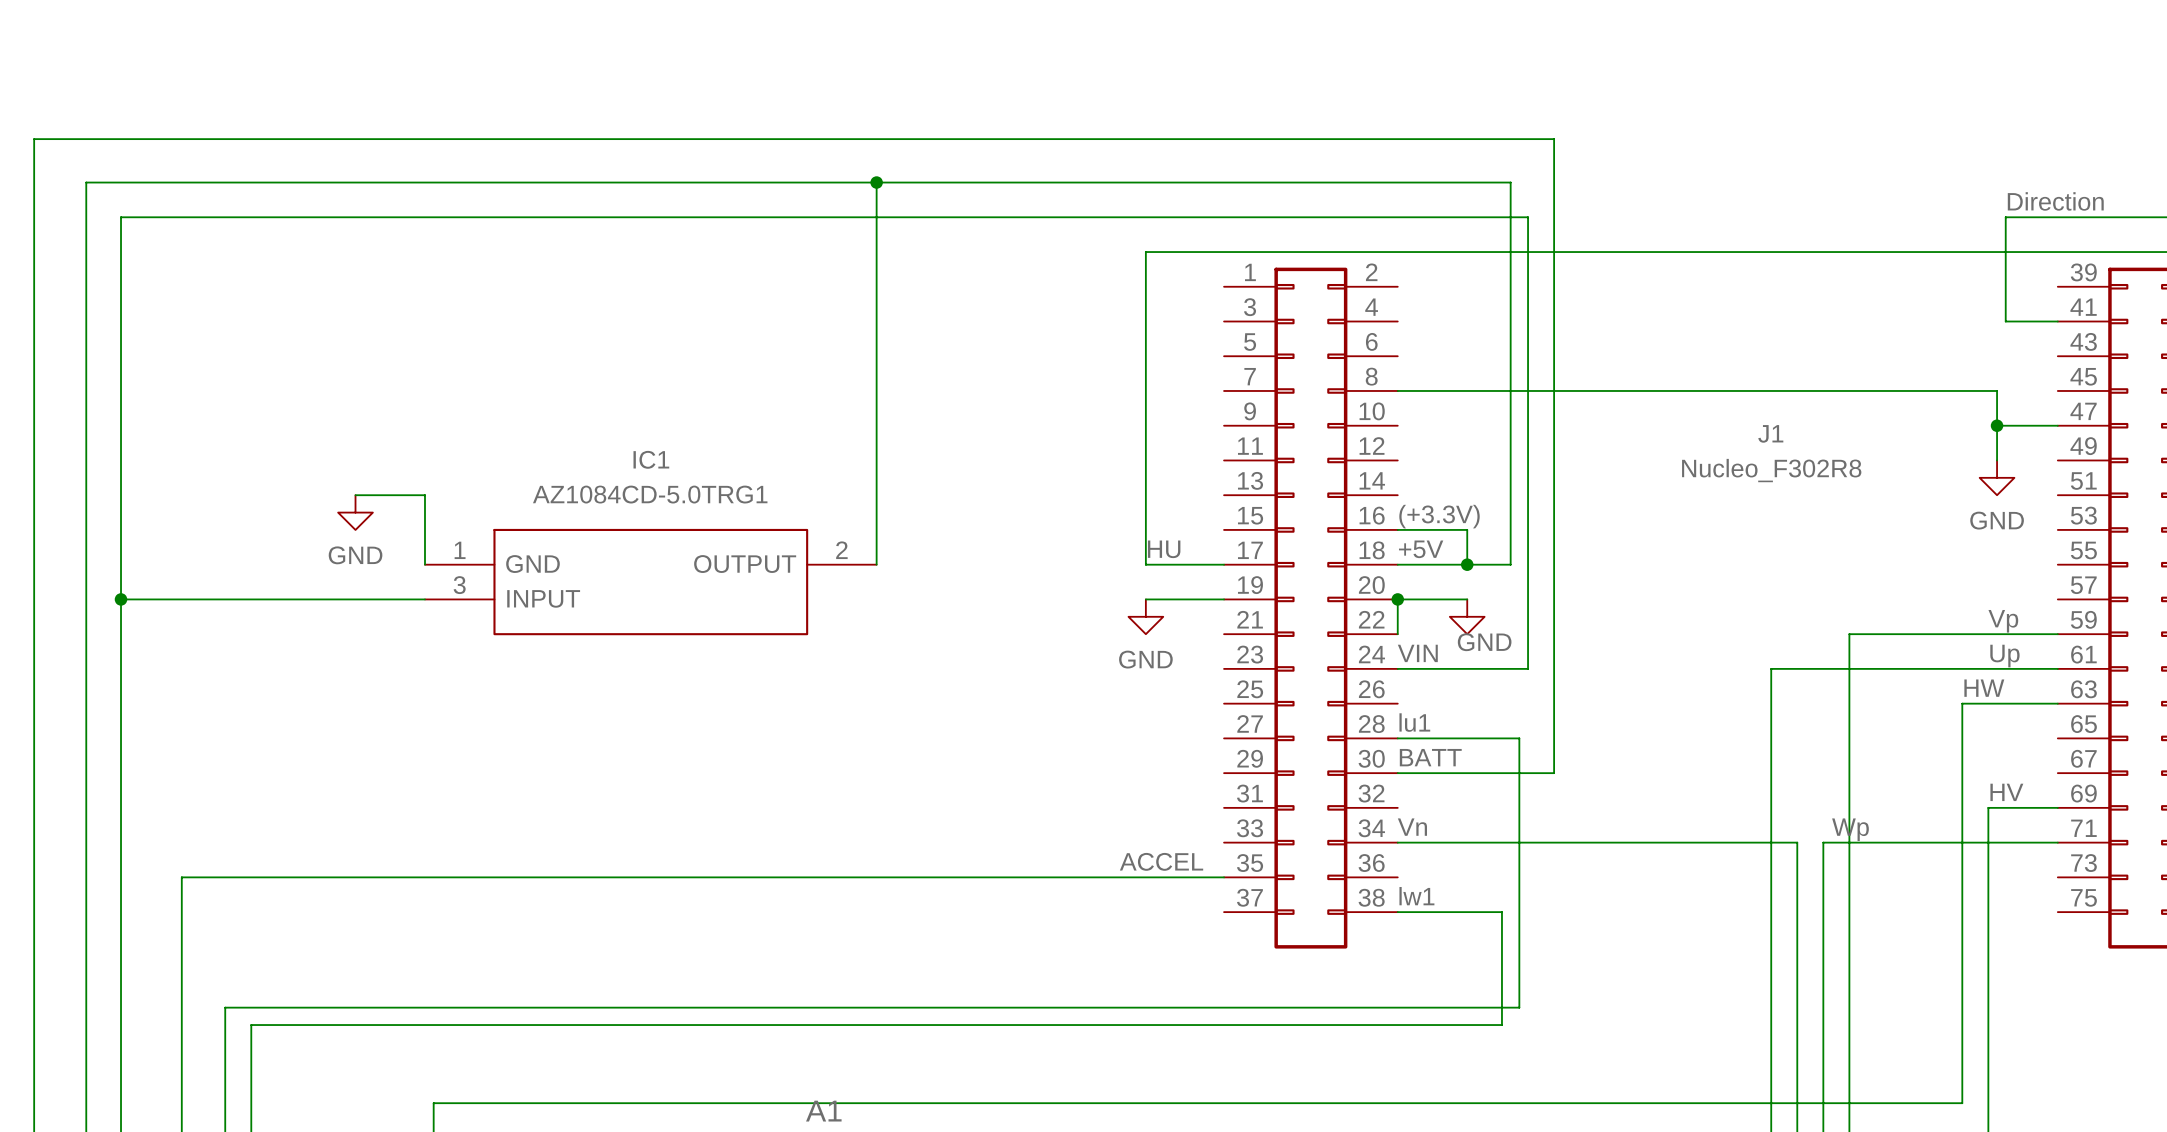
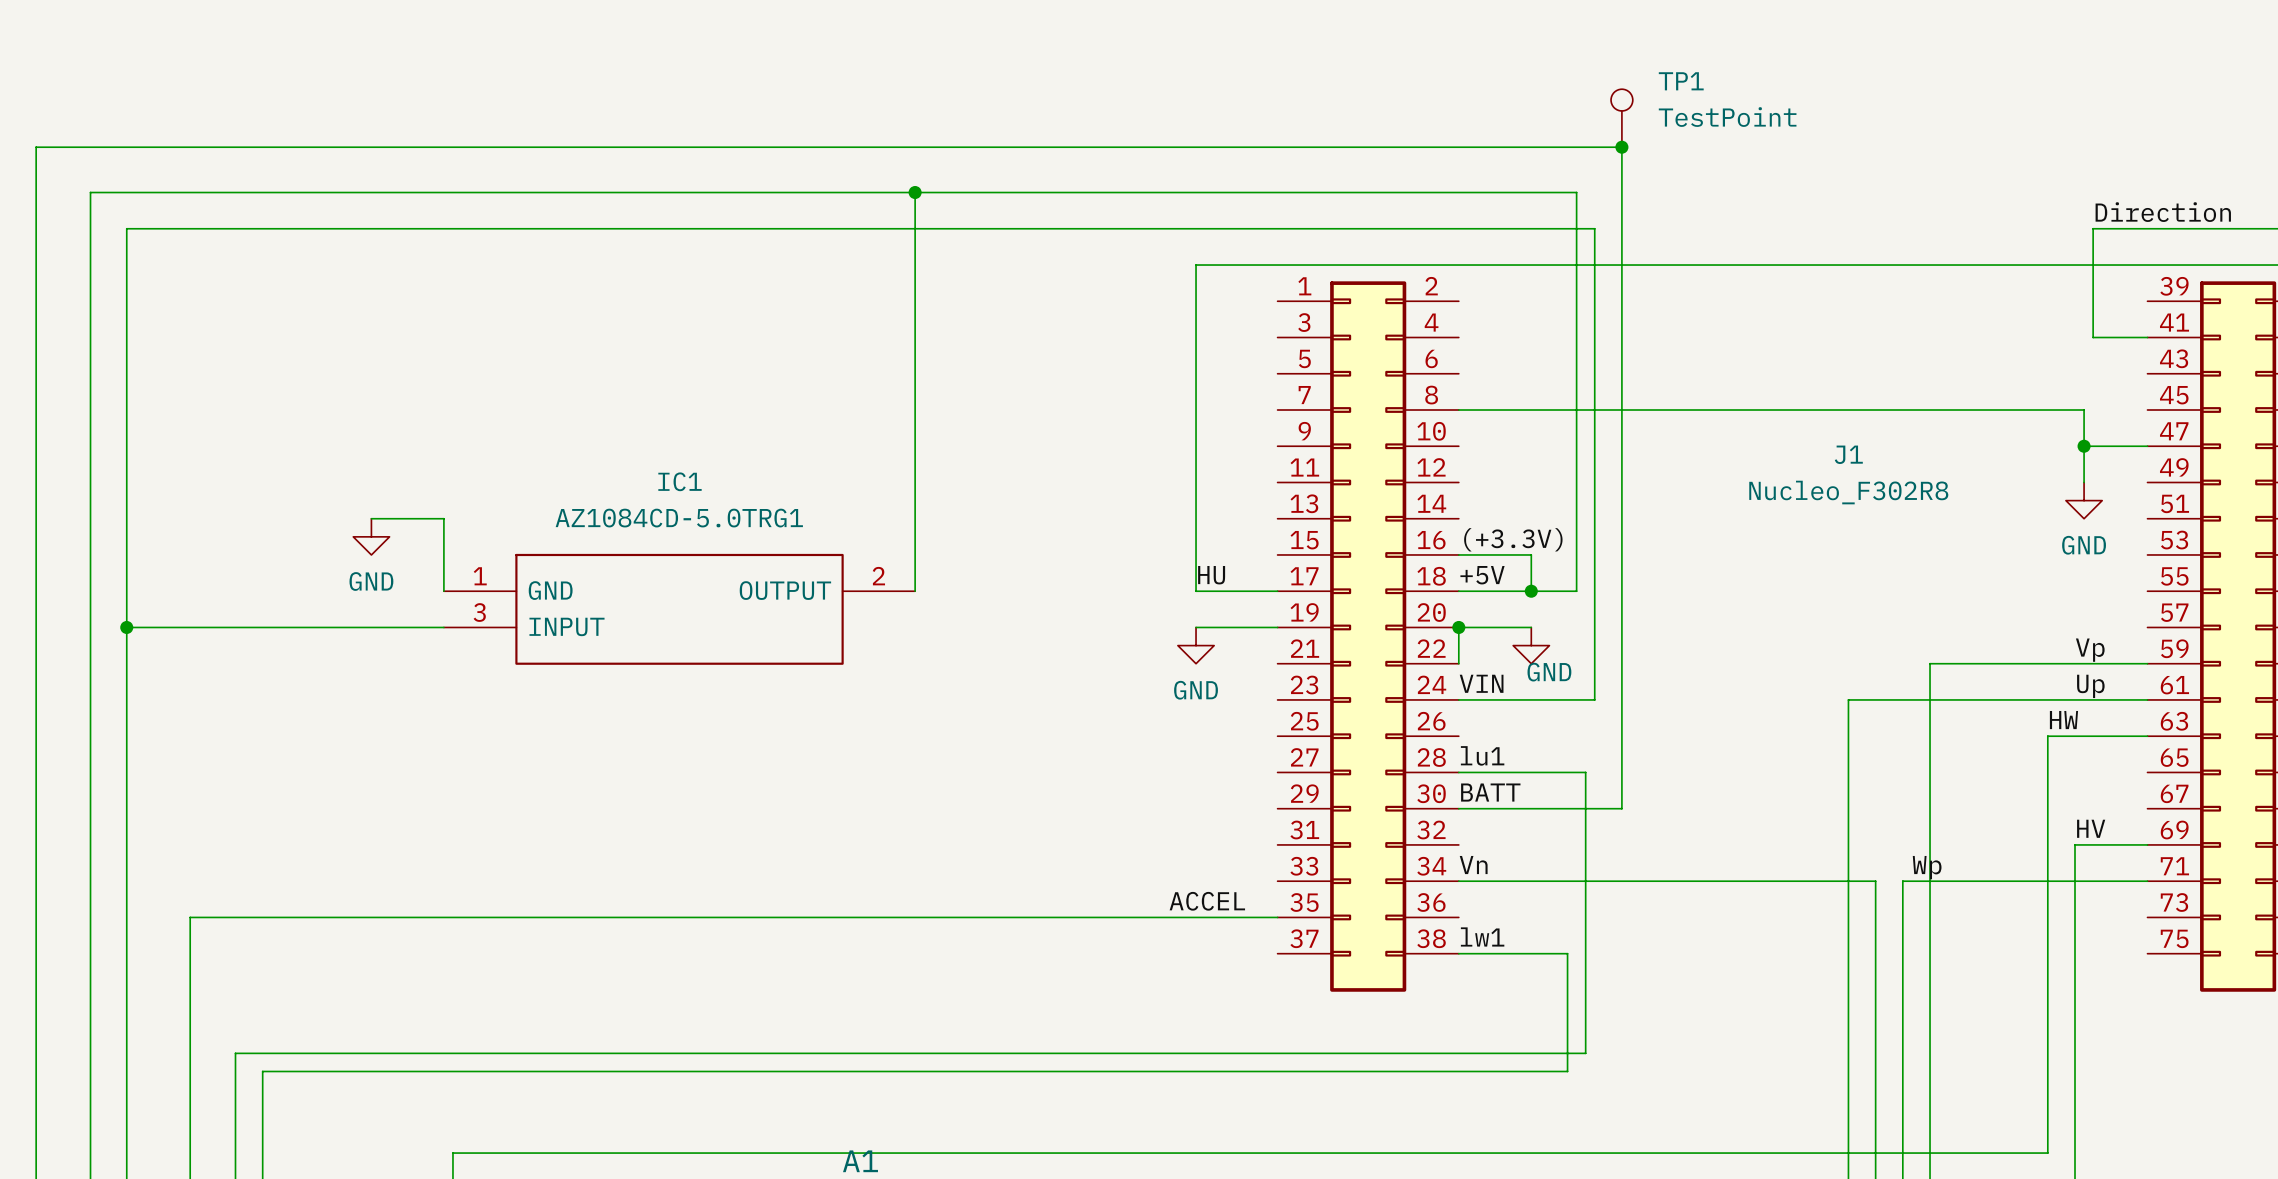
TP1: none -> TestPoint (1621, 118)
junction: none -> (1621, 147)

